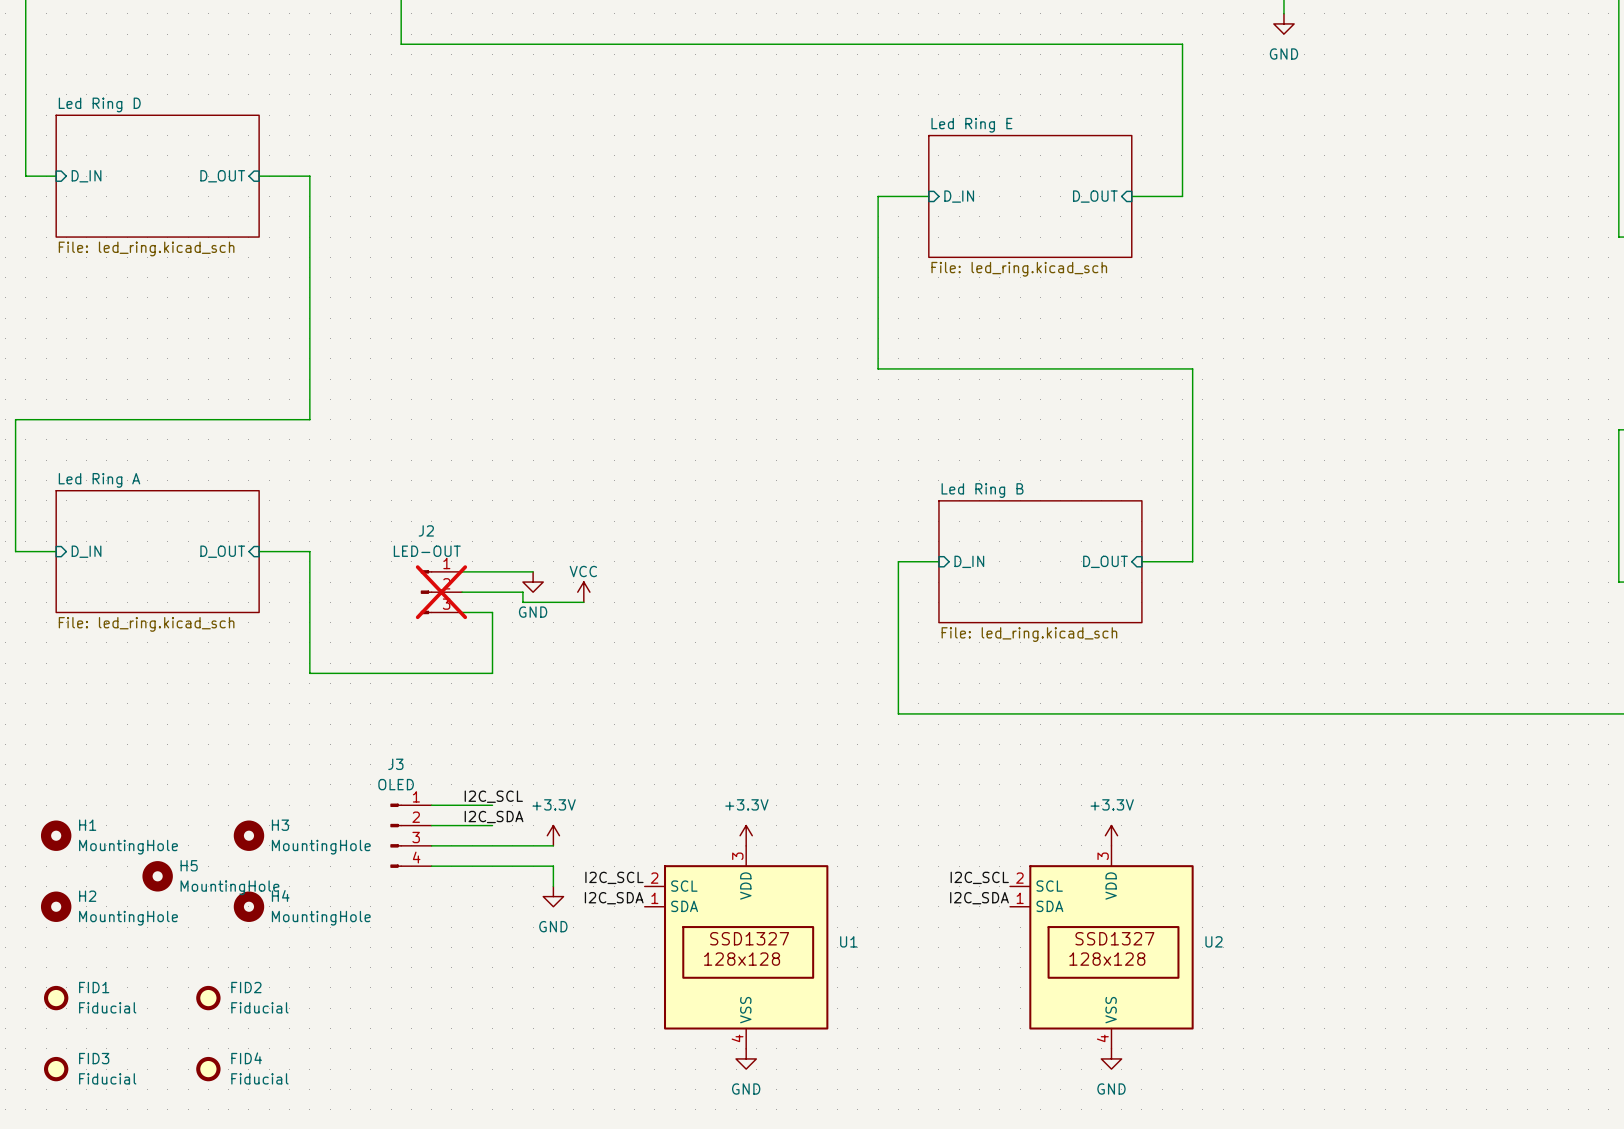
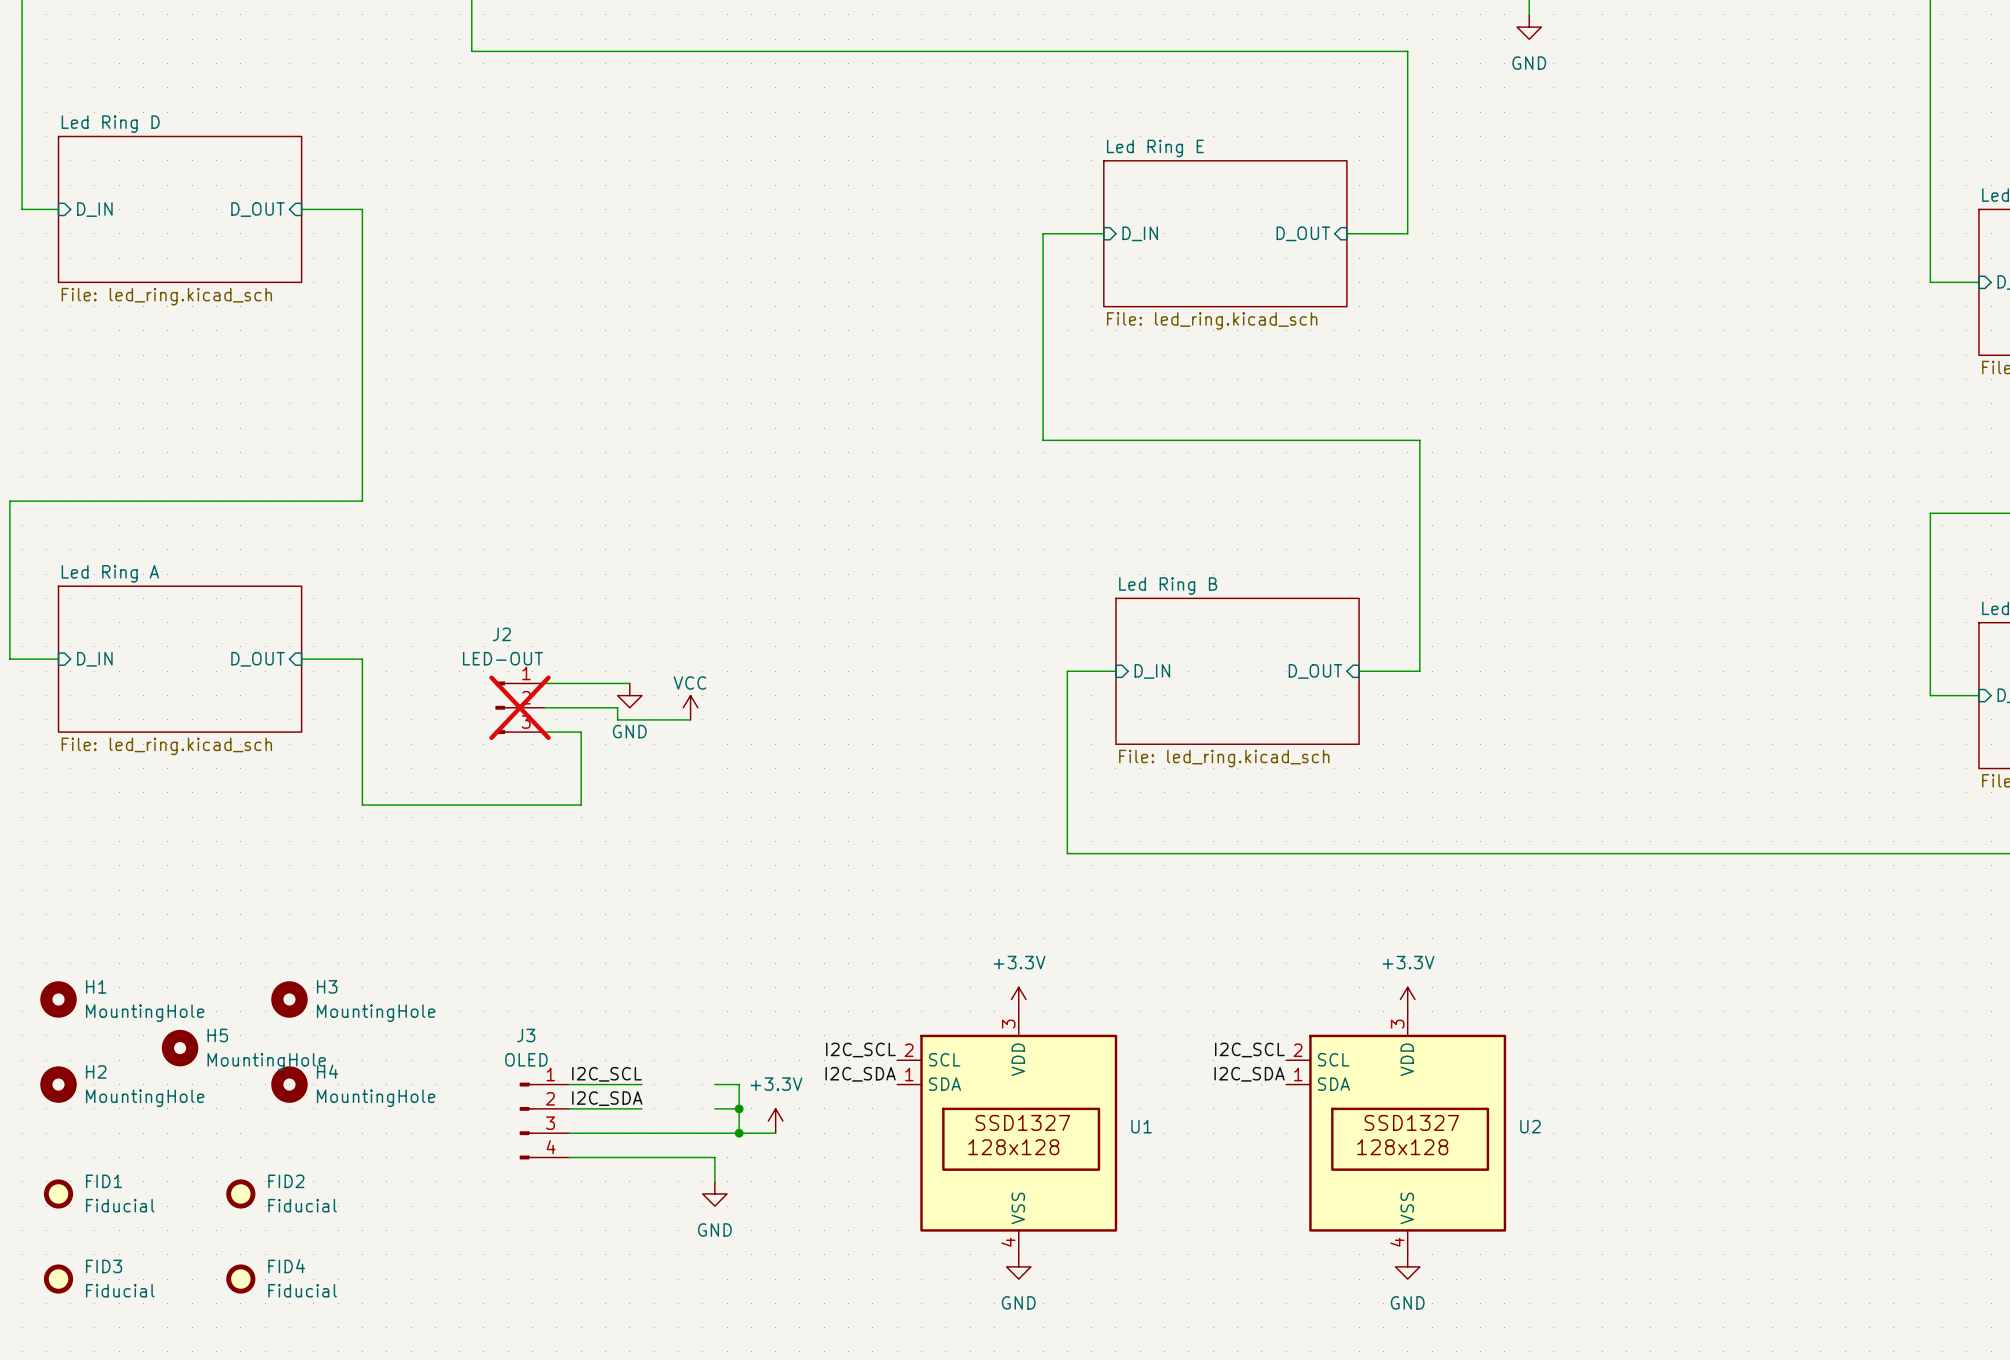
label: I2C_SCL (493, 796) -> none
wire: (431, 805) (492, 805) -> (569, 1084) (641, 1084)
label: I2C_SDA (494, 817) -> none
wire: (431, 825) (492, 825) -> (569, 1108) (641, 1108)
J3 position: (411, 835) -> (544, 1121)
power symbol: +3.3V (553, 835) -> none
power symbol: +3.3V (746, 835) -> none
power symbol: none -> +3.3V (1018, 999)
power symbol position: +3.3V (1111, 835) -> +3.3V (1407, 999)
wire: (431, 845) (553, 845) -> none
wire: (431, 866) (553, 866) (553, 886) -> (569, 1157) (714, 1157) (714, 1181)
label: I2C_SCL (614, 877) -> none
label: none -> I2C_SCL (860, 1049)
label position: I2C_SCL (979, 877) -> I2C_SCL (1249, 1049)
power symbol: GND (553, 896) -> none
label: none -> I2C_SCL (607, 1074)
label: I2C_SDA (614, 898) -> none
label: none -> I2C_SDA (860, 1074)
label position: I2C_SDA (979, 898) -> I2C_SDA (1249, 1074)
wire: none -> (714, 1084) (739, 1084) (739, 1133)
label: none -> I2C_SDA (607, 1098)
wire: none -> (714, 1108) (739, 1108)
junction: none -> (739, 1108)
power symbol: none -> +3.3V (775, 1121)
wire: none -> (569, 1133) (775, 1133)
junction: none -> (739, 1133)
U1 position: (736, 947) -> (1007, 1133)
U2 position: (1101, 947) -> (1396, 1133)
power symbol: none -> GND (714, 1193)
power symbol: GND (746, 1058) -> none
power symbol: none -> GND (1018, 1266)
power symbol position: GND (1111, 1058) -> GND (1407, 1266)

